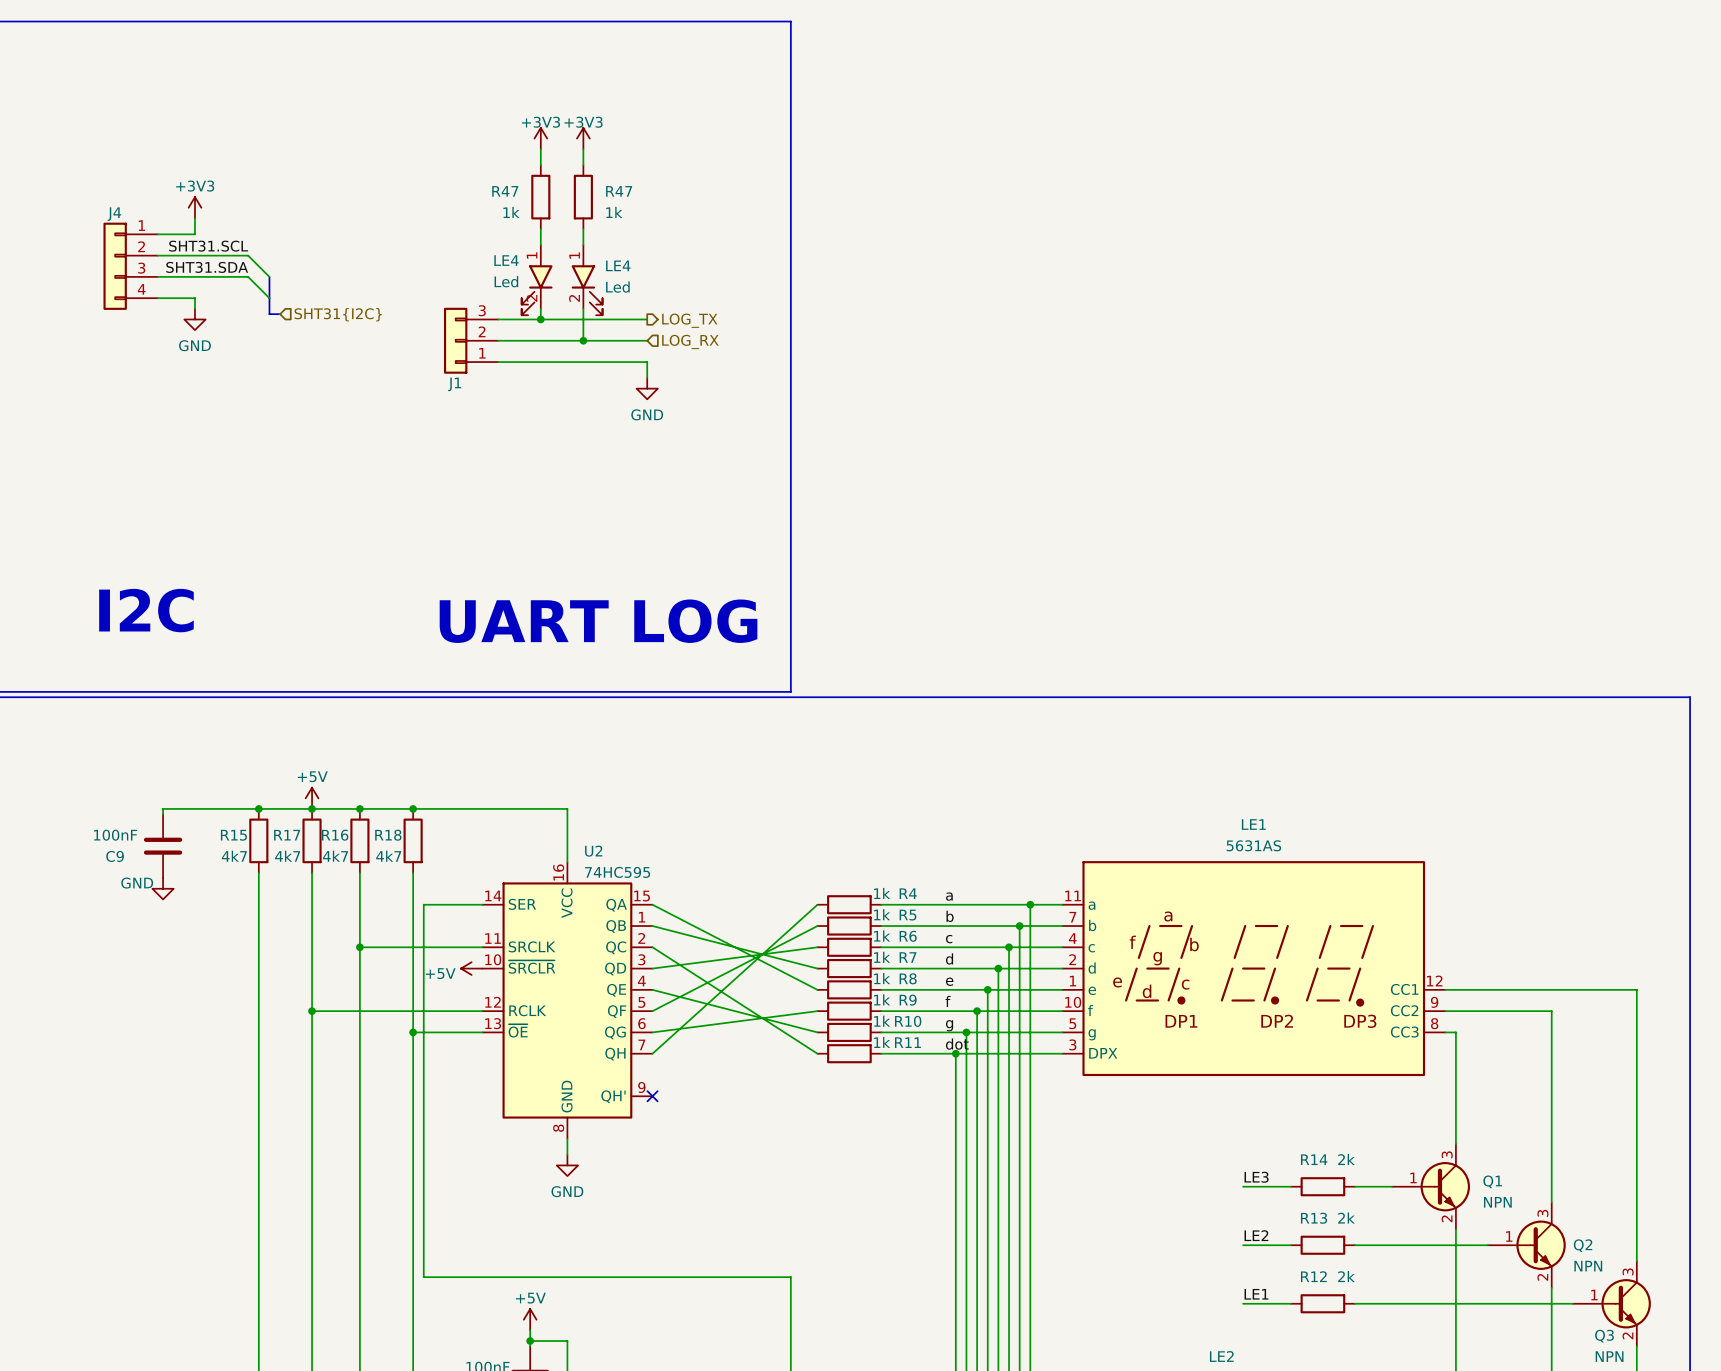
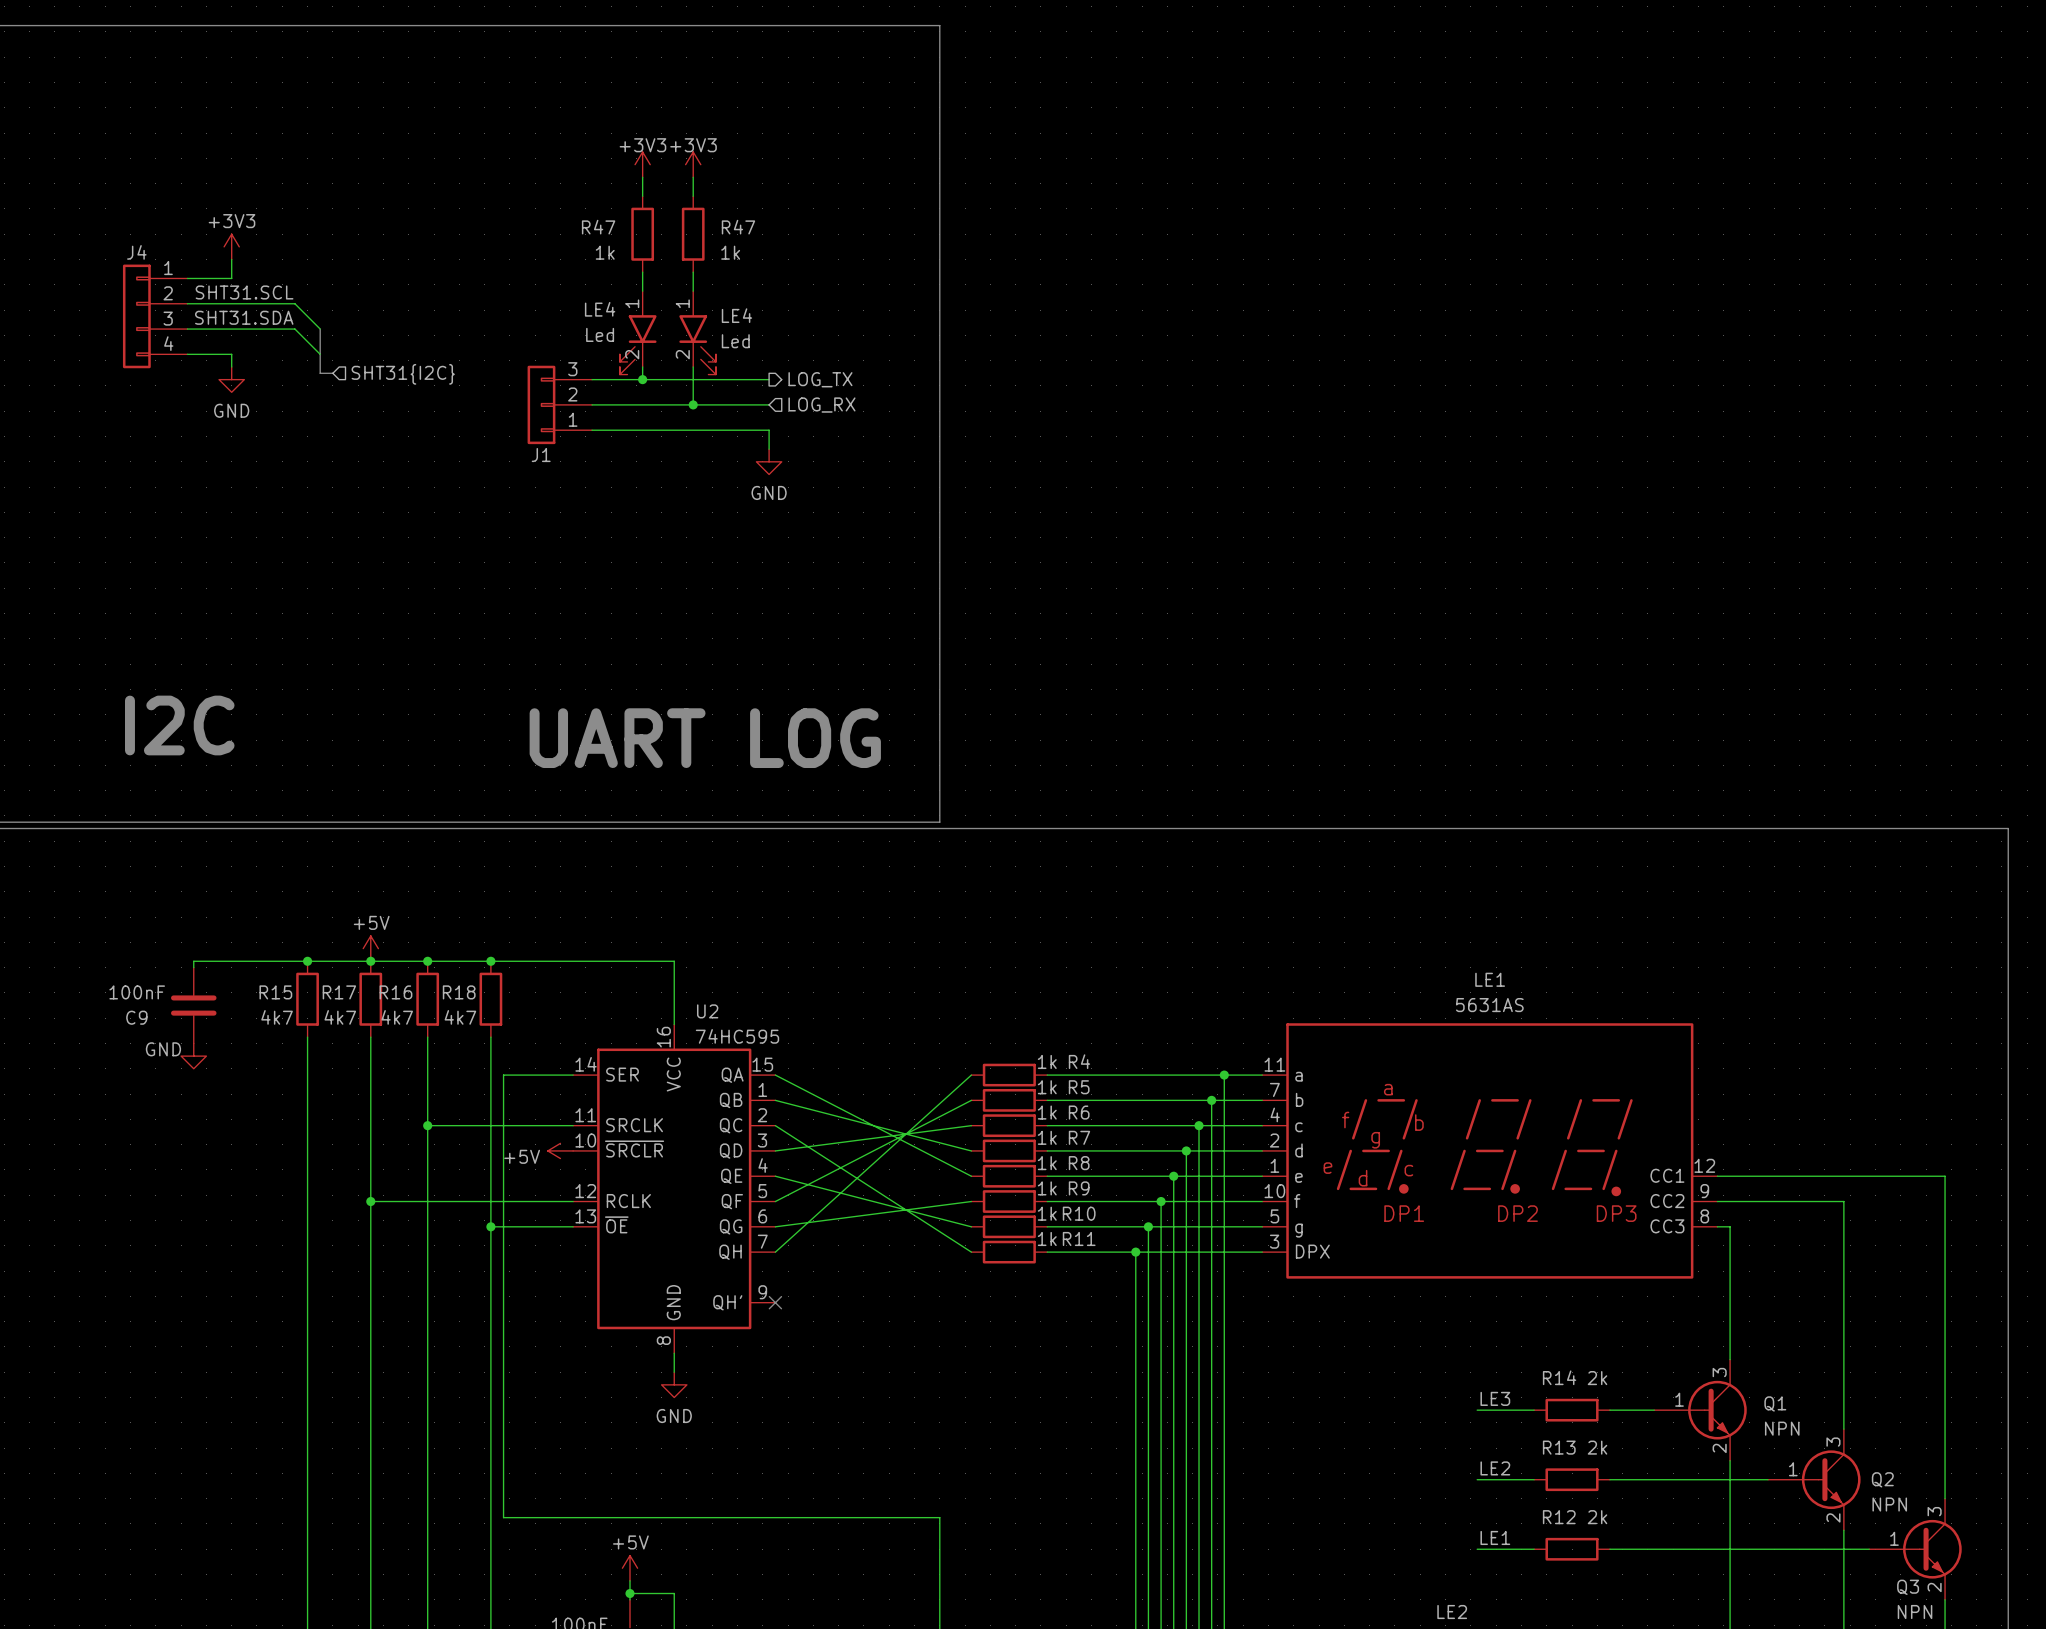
label: a (949, 896) -> none
label: b (950, 916) -> none
label: c (949, 939) -> none
label: d (949, 958) -> none
label: e (949, 981) -> none
label: f (948, 1001) -> none
label: g (949, 1025) -> none
label: dot (957, 1044) -> none

